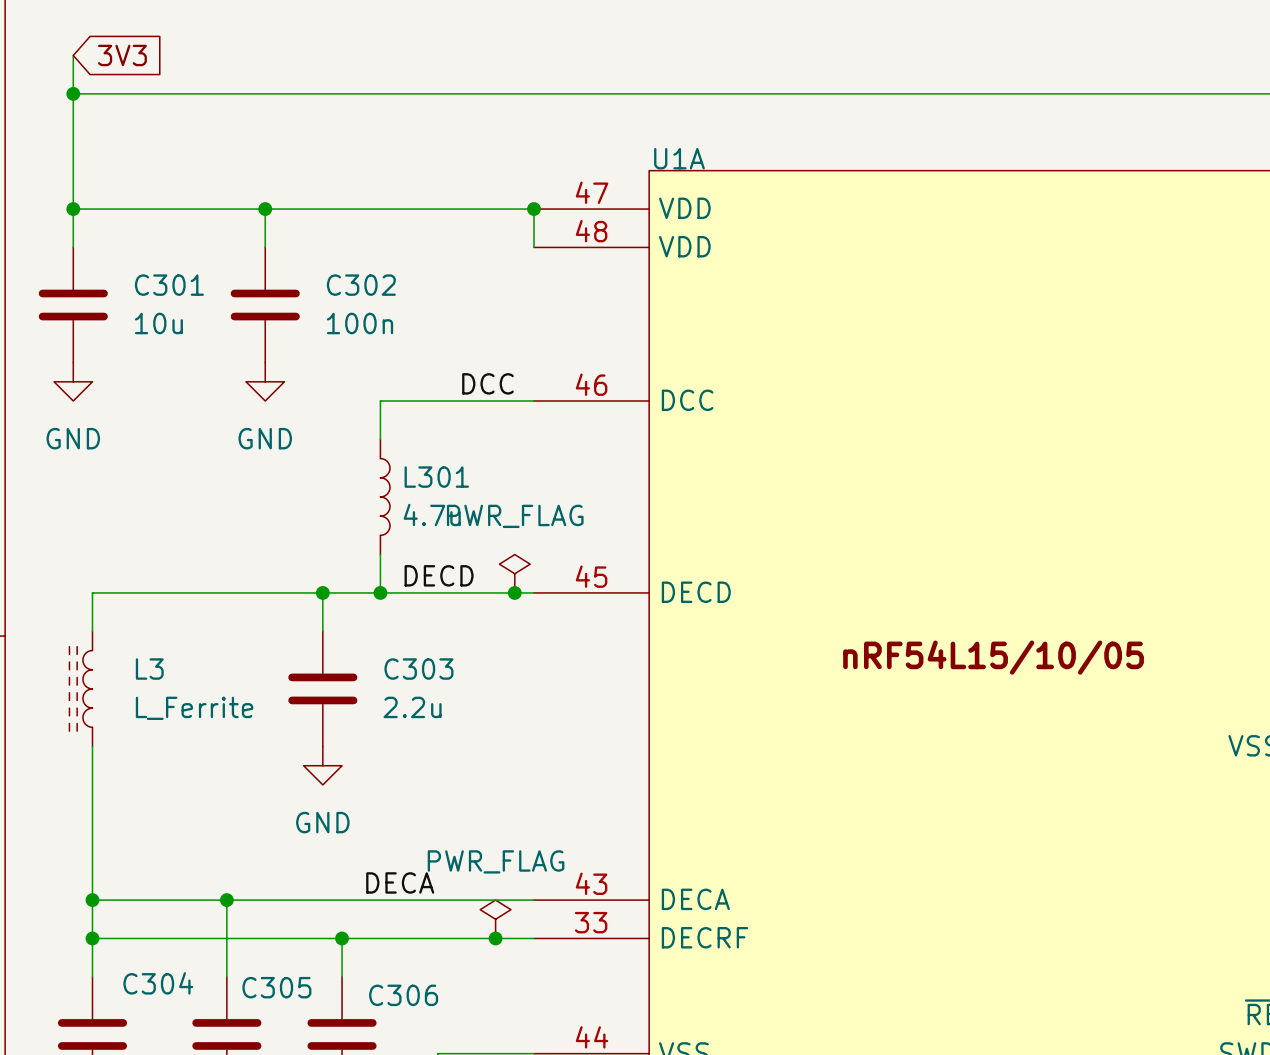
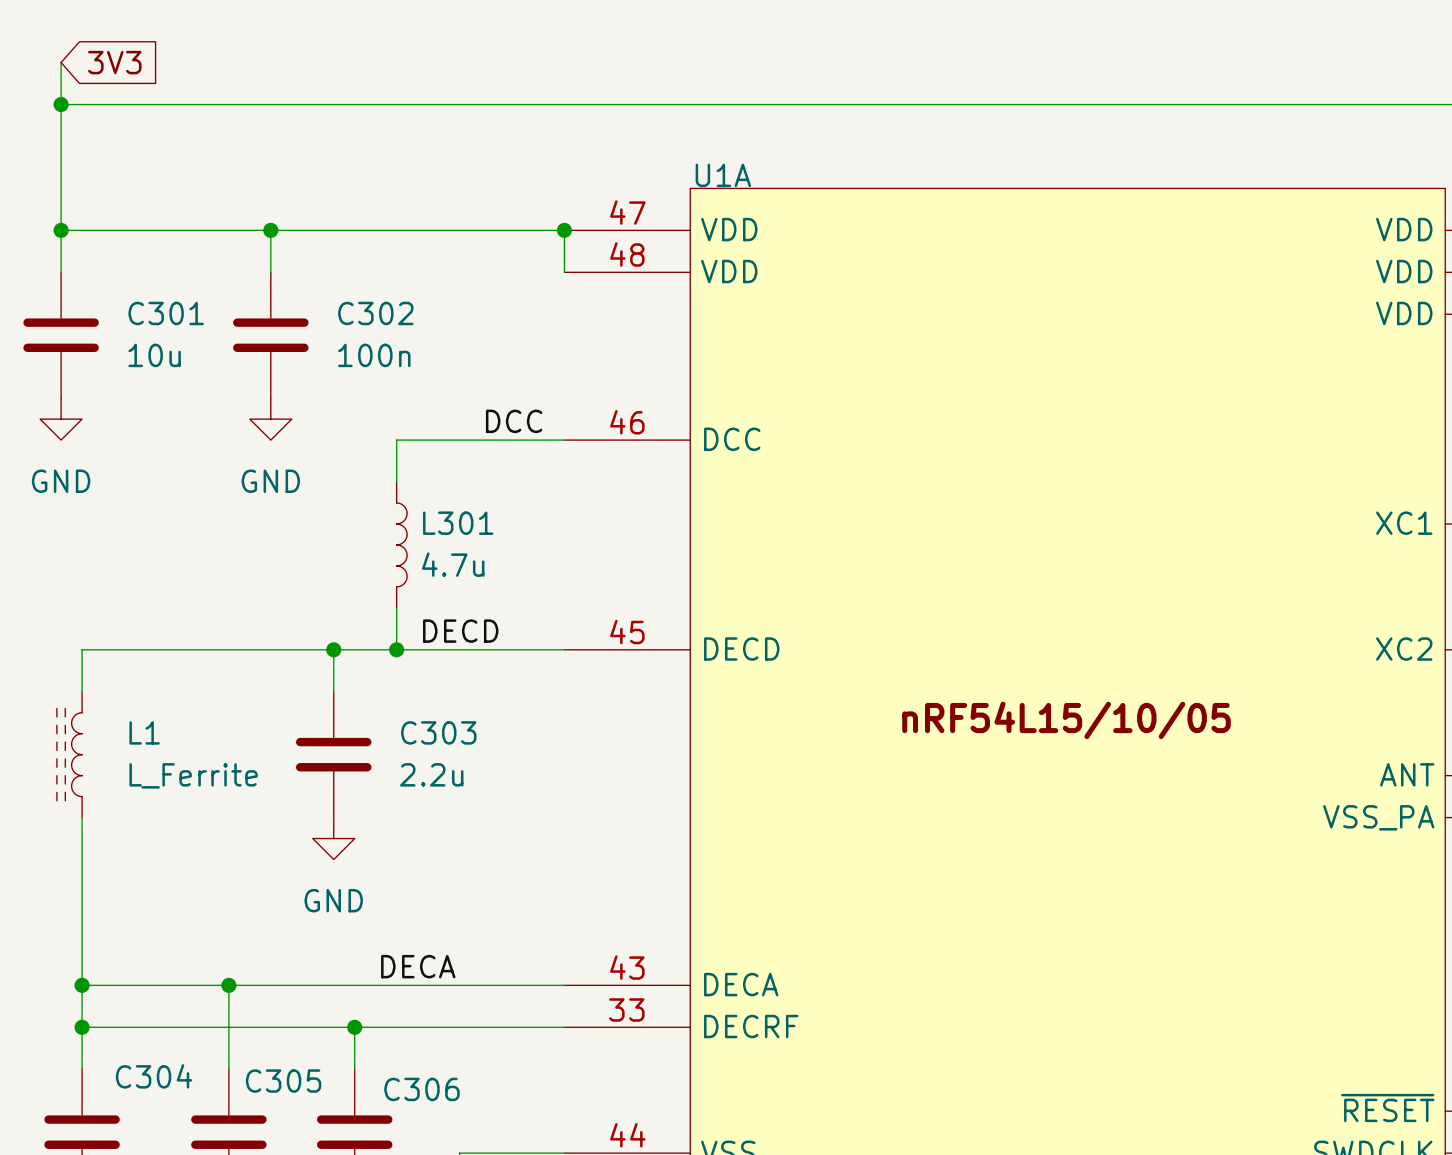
power symbol: PWR_FLAG (514, 573) -> none
junction: (514, 592) -> none
L3 name: L3 (149, 669) -> L1 (144, 732)
power symbol: PWR_FLAG (495, 919) -> none
junction: (495, 938) -> none

